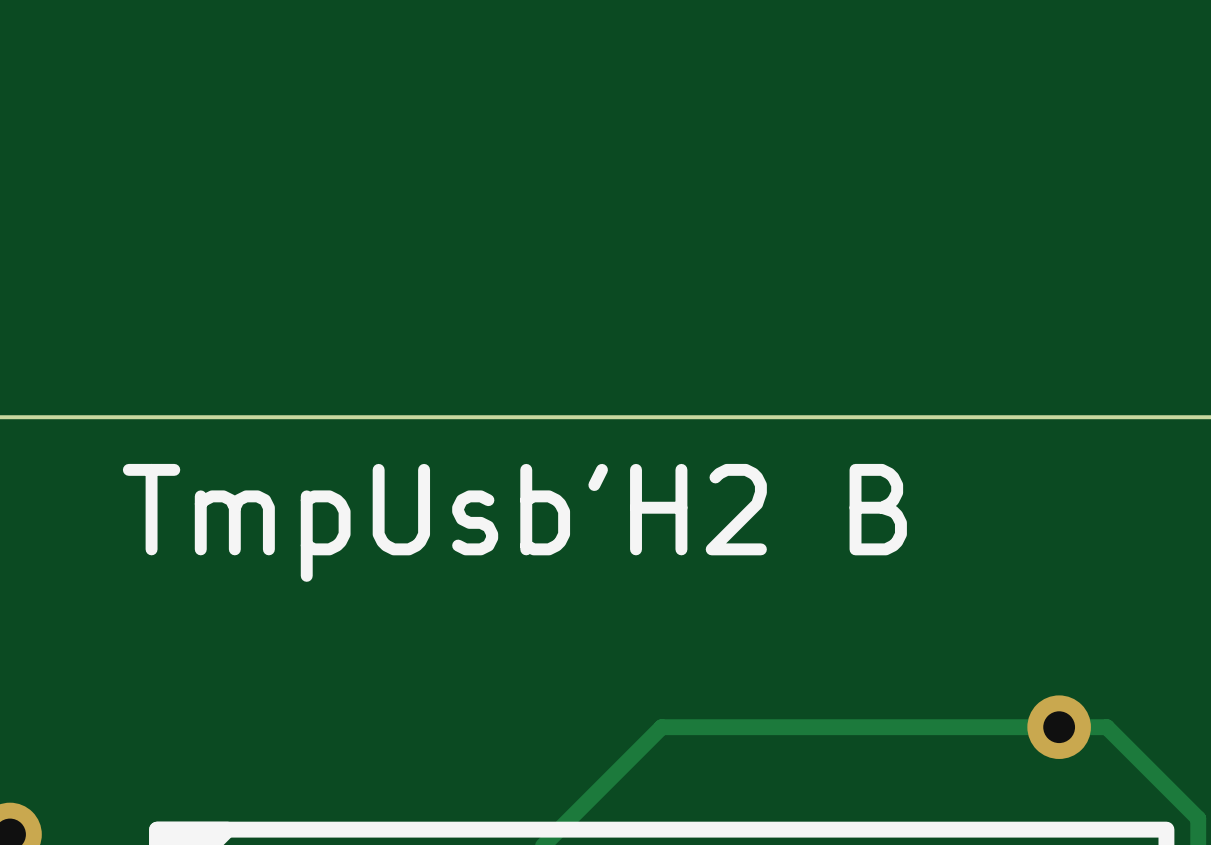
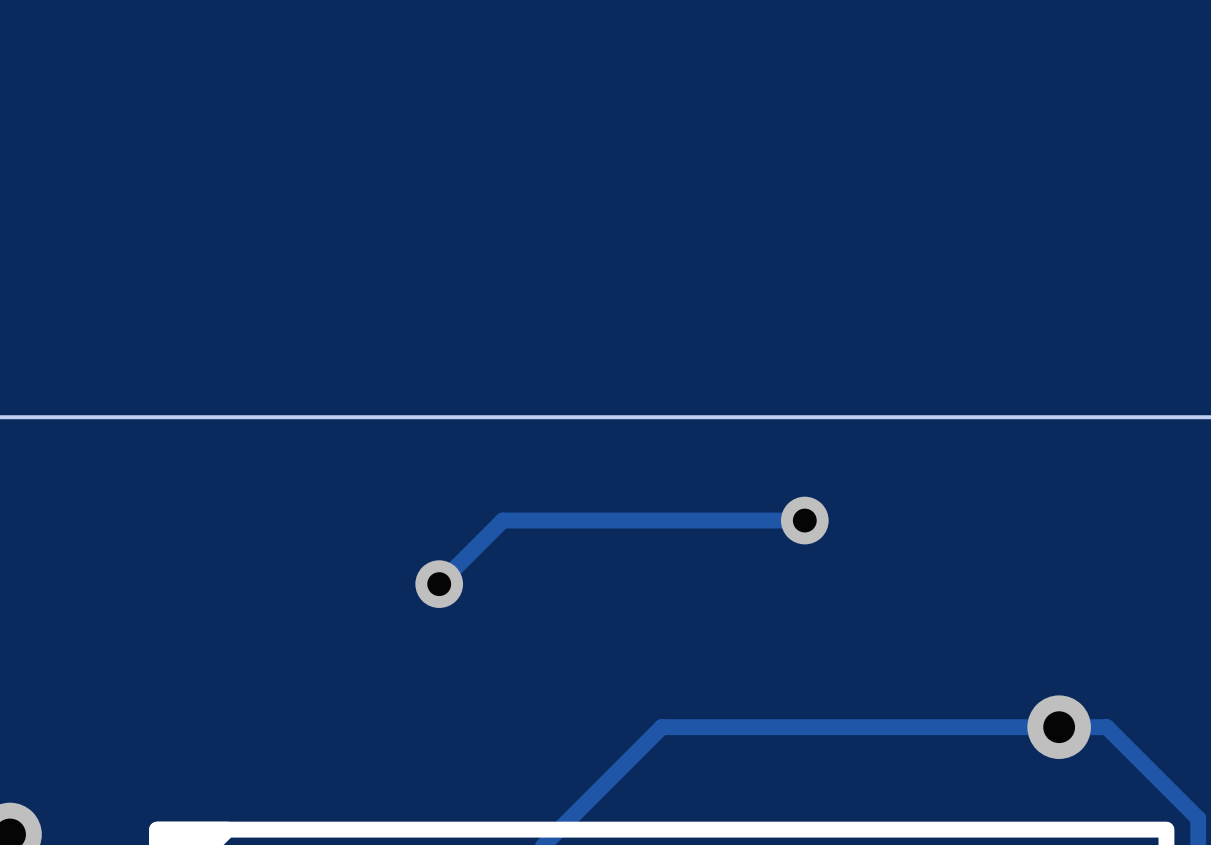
track: none -> (804, 520) (502, 520) (439, 584)
via: none -> (804, 520)
text: TmpUsb'H2 B (514, 522) -> none
via: none -> (439, 584)

